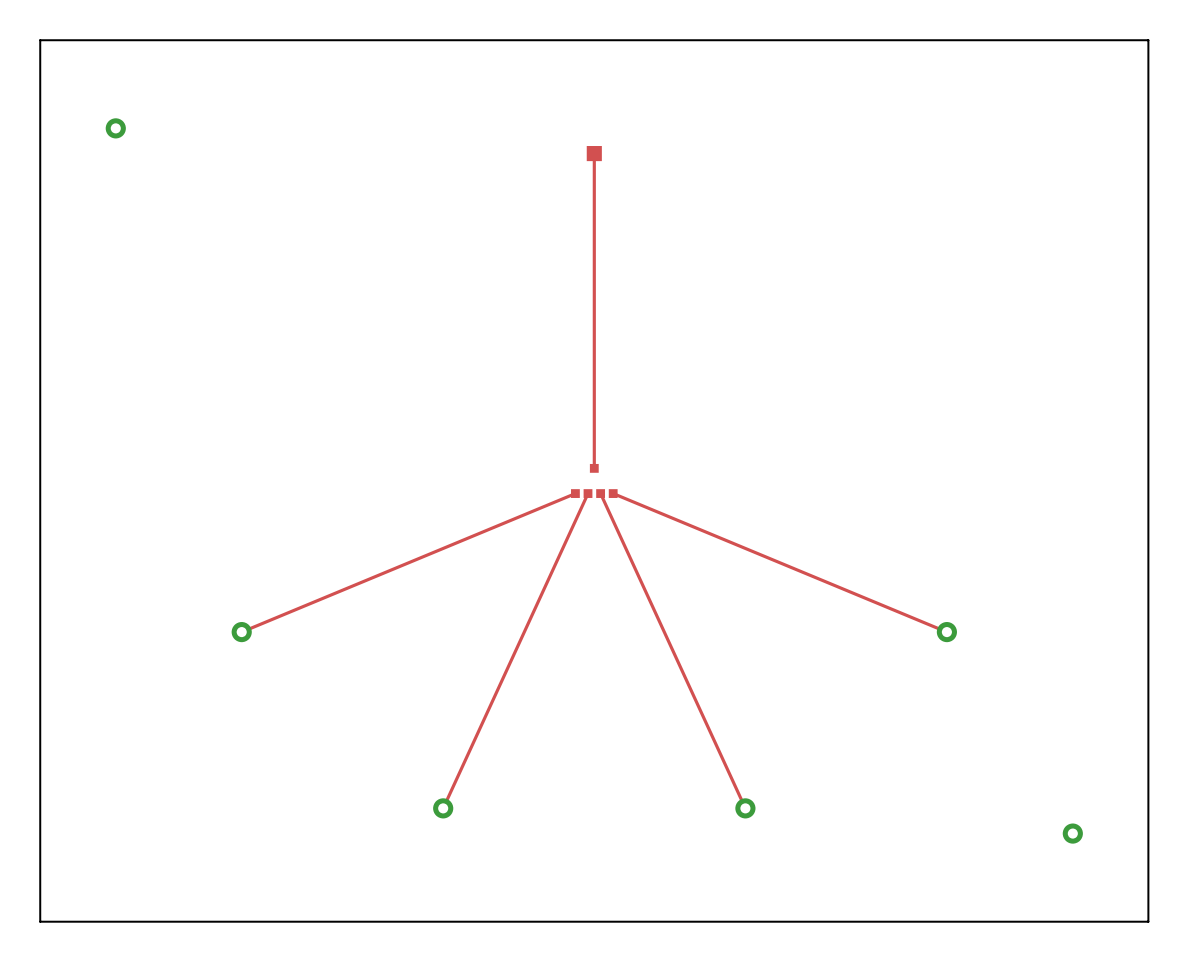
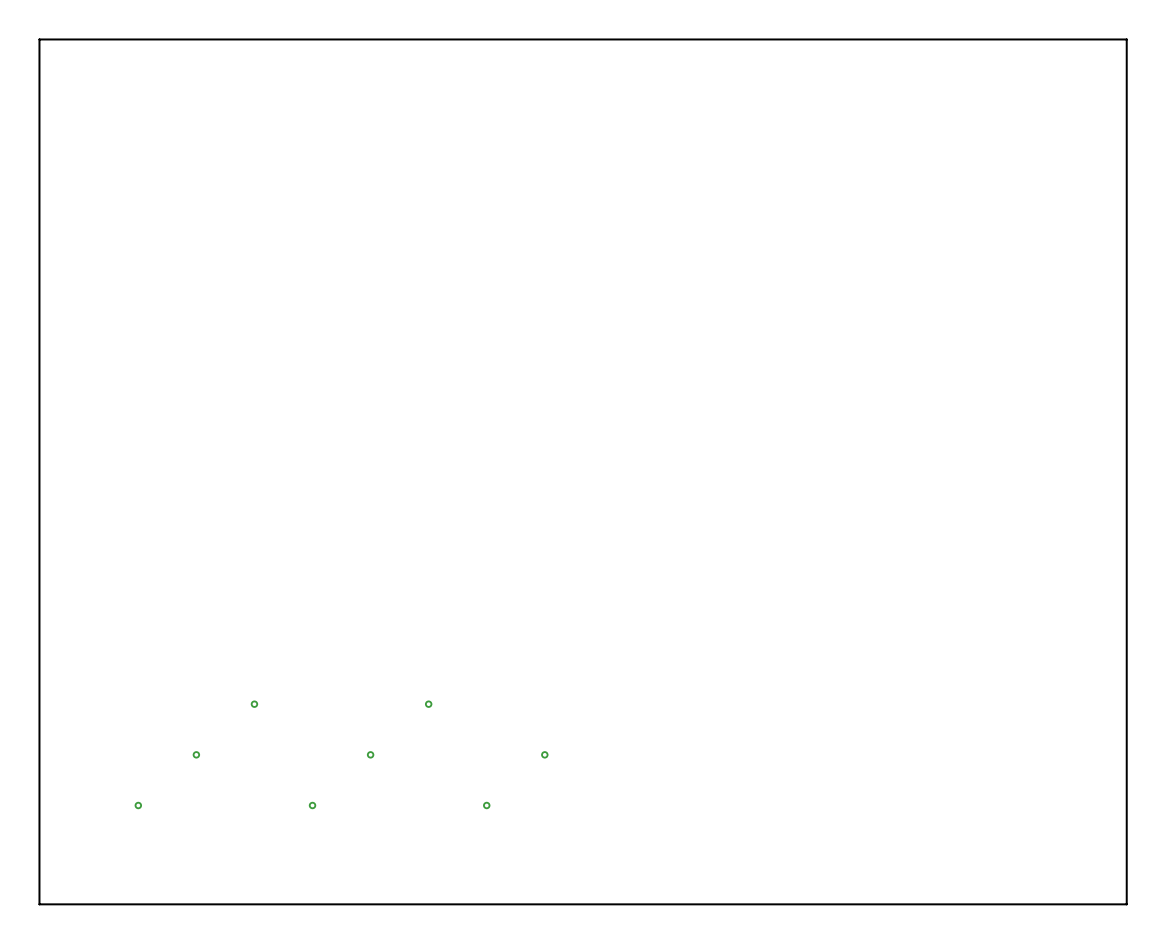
part: (115, 128) -> none
track: (594, 153) (594, 468) -> none
part: (594, 153) -> none
part: (594, 480) -> none
track: (575, 493) (241, 632) -> none
track: (588, 493) (443, 808) -> none
track: (600, 493) (745, 808) -> none
track: (613, 493) (946, 632) -> none
part: (241, 632) -> none
part: (946, 632) -> none
via: none -> (254, 704)
via: none -> (428, 704)
via: none -> (196, 754)
via: none -> (370, 754)
via: none -> (544, 754)
part: (443, 808) -> none
part: (745, 808) -> none
via: none -> (138, 805)
via: none -> (312, 805)
via: none -> (486, 805)
part: (1072, 833) -> none

